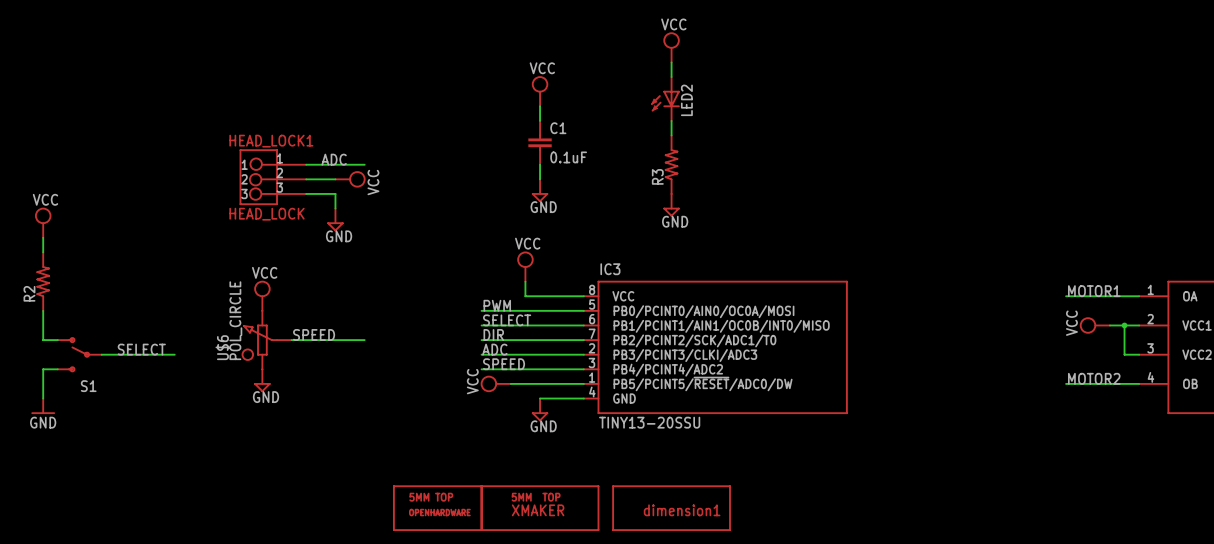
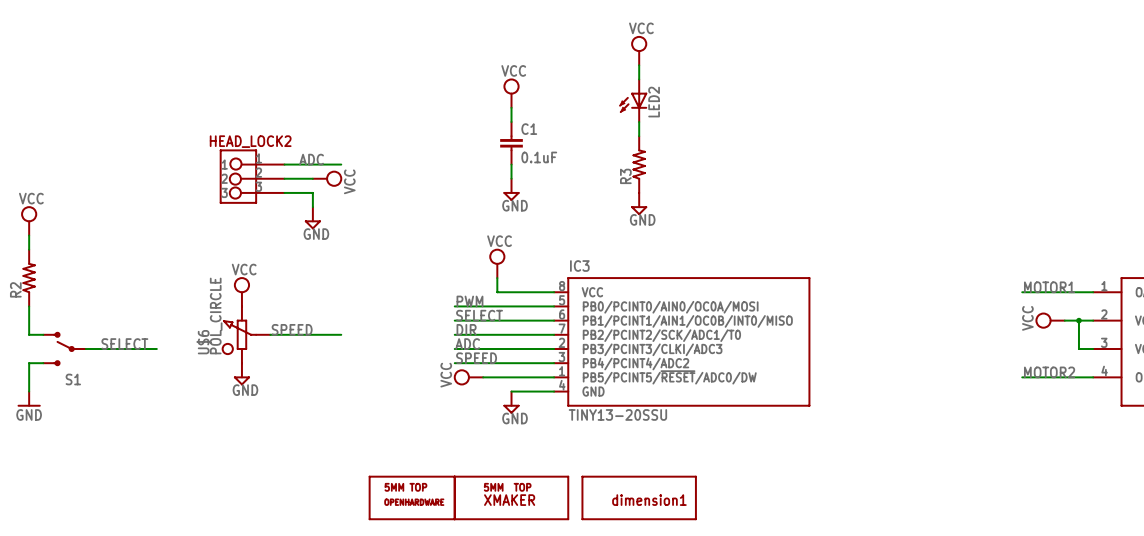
HEAD_LOCK1 name: HEAD_LOCK1 (271, 141) -> HEAD_LOCK2 (250, 141)
HEAD_LOCK1 value: HEAD_LOCK (266, 214) -> none

